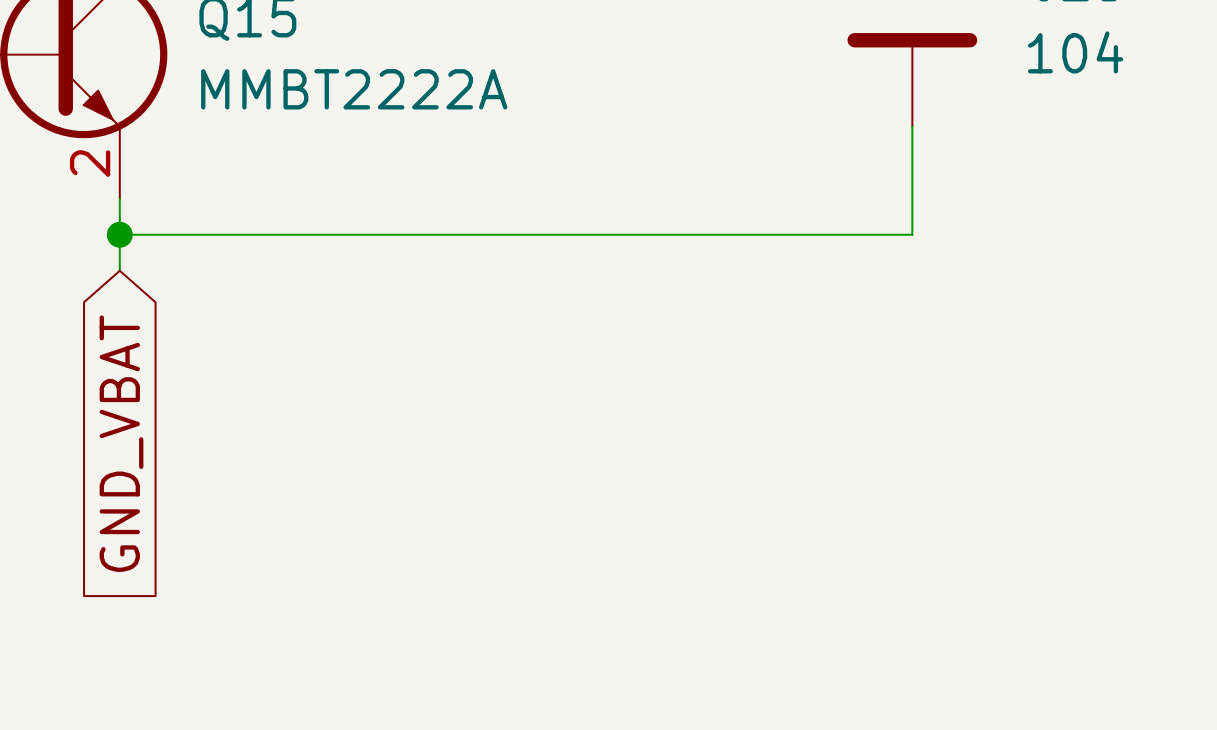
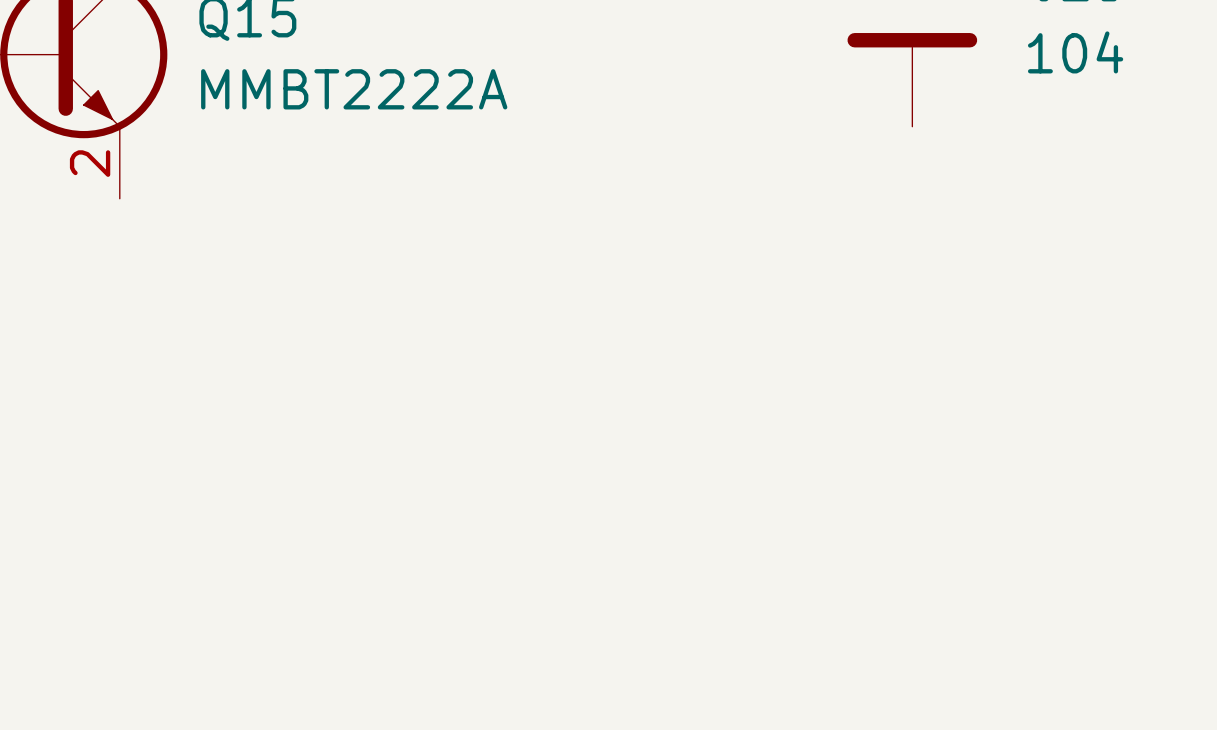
wire: (912, 126) (912, 234) (119, 234) -> none
wire: (119, 198) (119, 270) -> none
junction: (119, 234) -> none
global label: GND_VBAT (121, 443) -> none

